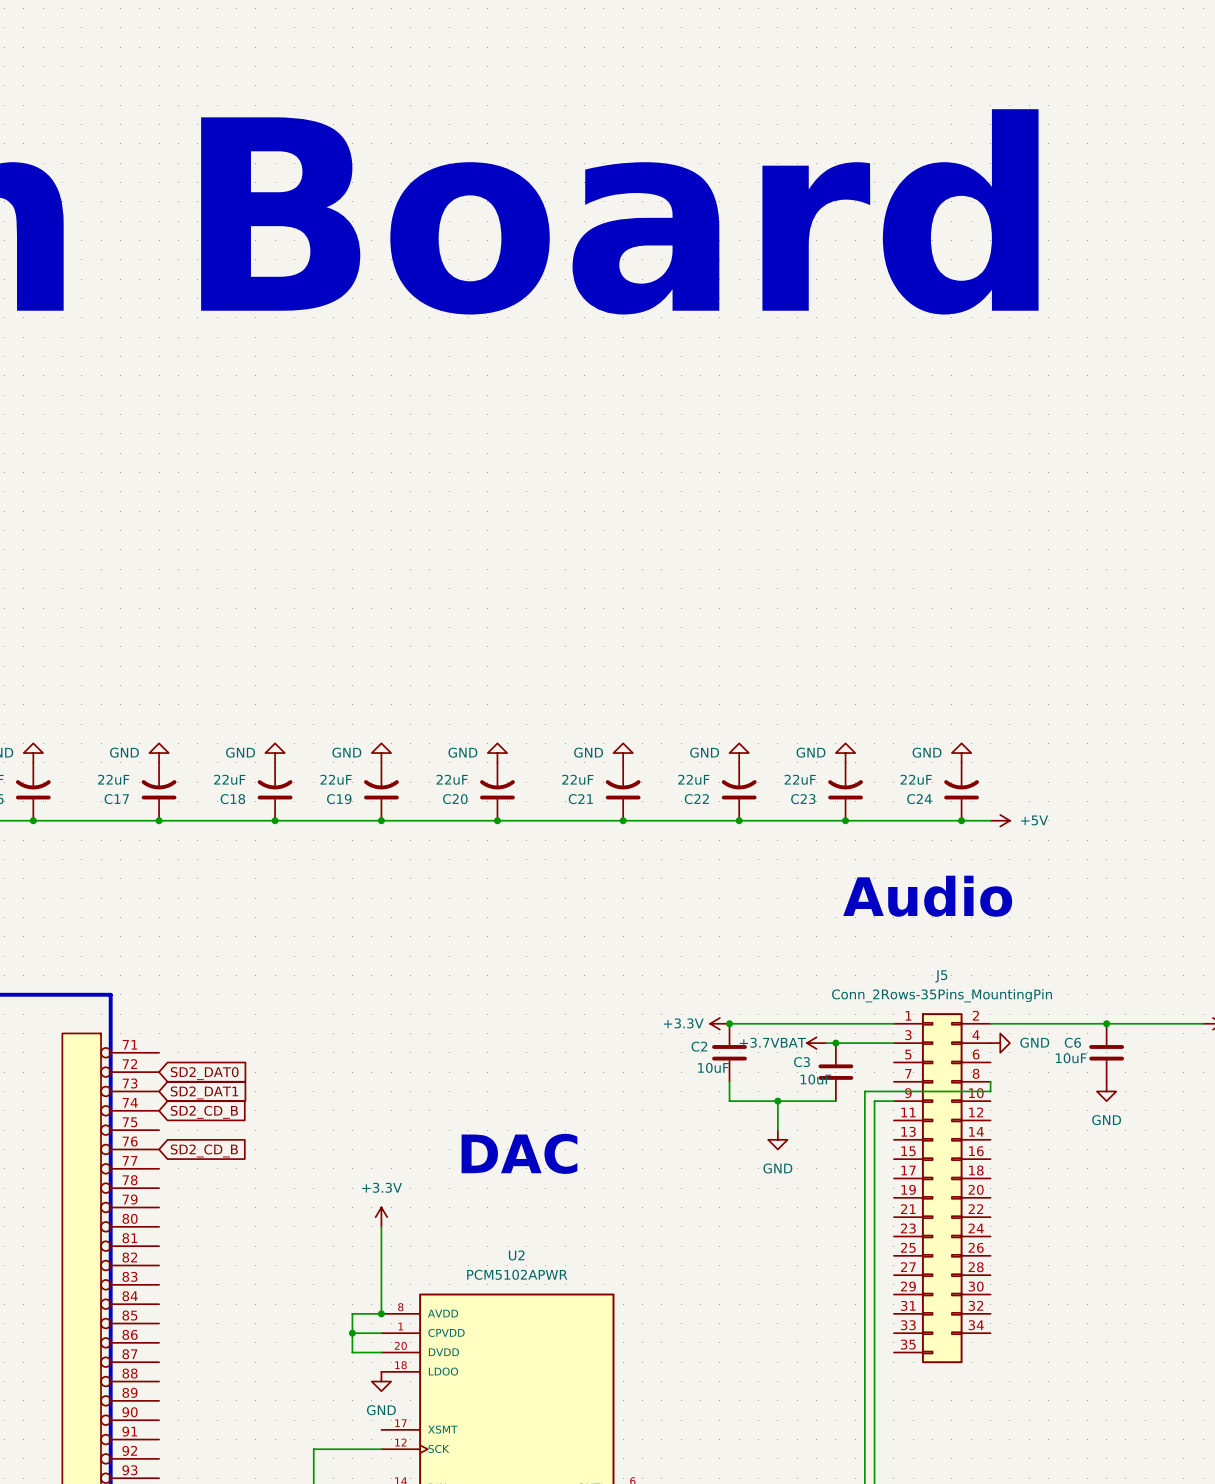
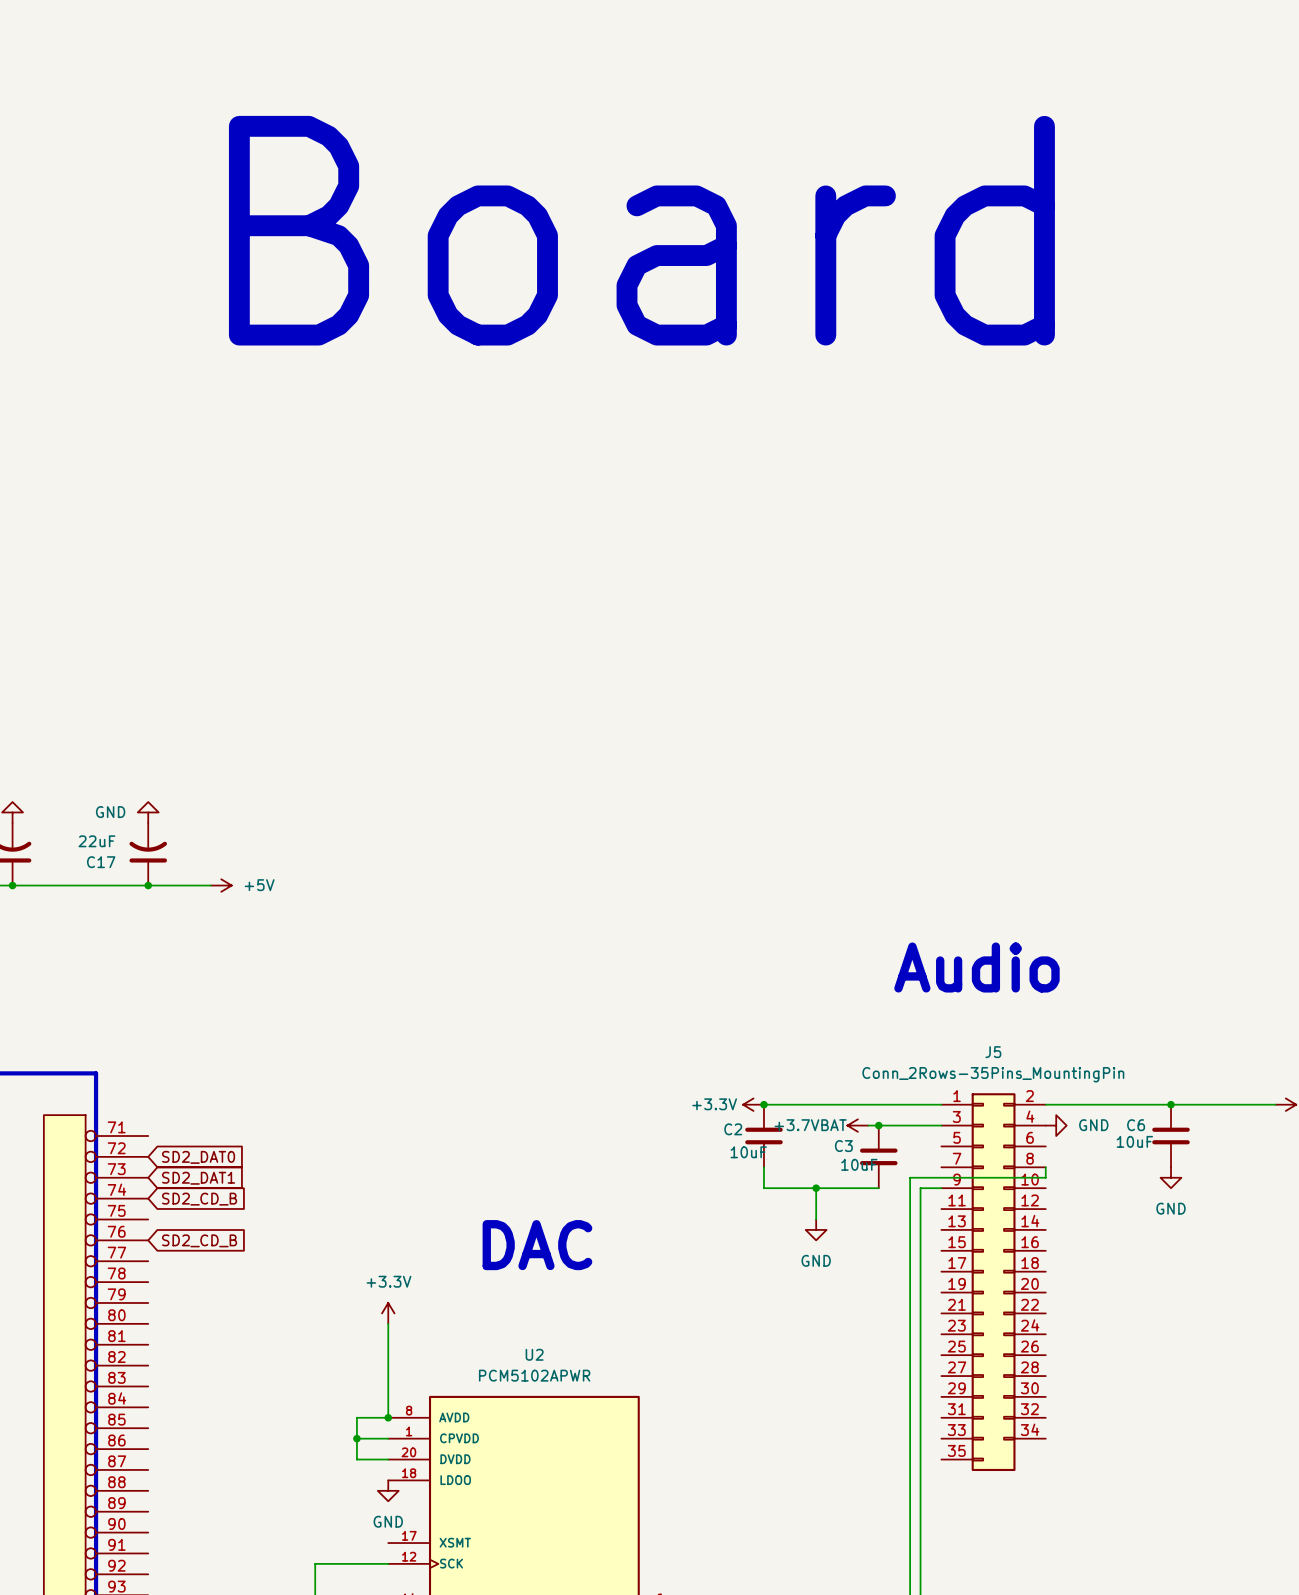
power symbol: GND (275, 753) -> none
power symbol: GND (381, 753) -> none
power symbol: GND (497, 753) -> none
power symbol: GND (623, 753) -> none
power symbol: GND (739, 753) -> none
power symbol: GND (845, 753) -> none
power symbol: GND (961, 753) -> none
C18: 22uF (275, 791) -> none
C19: 22uF (381, 791) -> none
C20: 22uF (497, 791) -> none
C21: 22uF (623, 791) -> none
C22: 22uF (739, 791) -> none
C23: 22uF (845, 791) -> none
C24: 22uF (961, 791) -> none
wire: (217, 820) (990, 820) -> none
power symbol: none -> +5V (221, 885)
junction: (275, 820) -> none
junction: (381, 820) -> none
junction: (497, 820) -> none
junction: (623, 820) -> none
junction: (739, 820) -> none
junction: (845, 820) -> none
junction: (961, 820) -> none
power symbol: +5V (1000, 820) -> none

